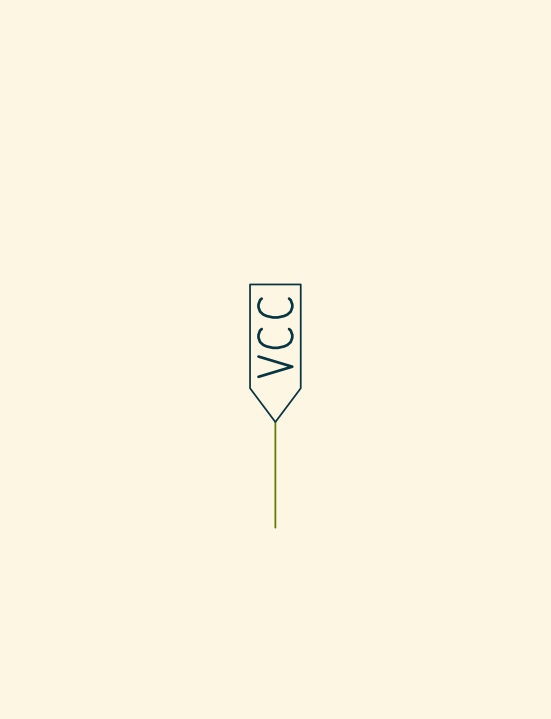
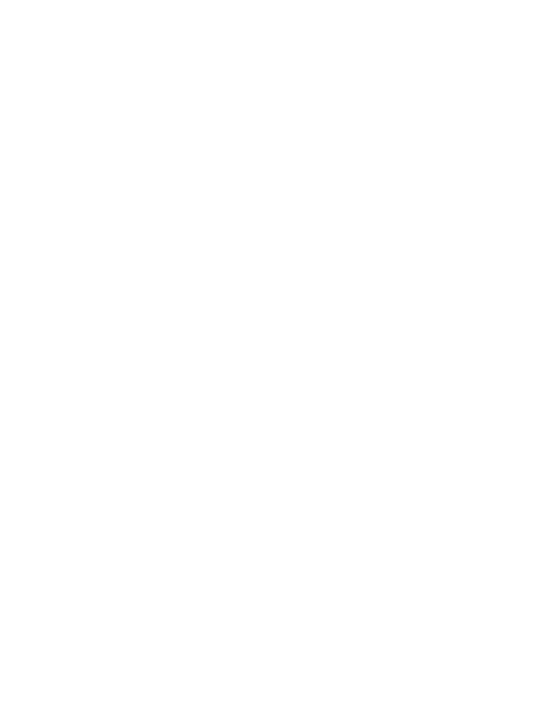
global label: VCC (275, 337) -> none
wire: (275, 422) (275, 527) -> none

